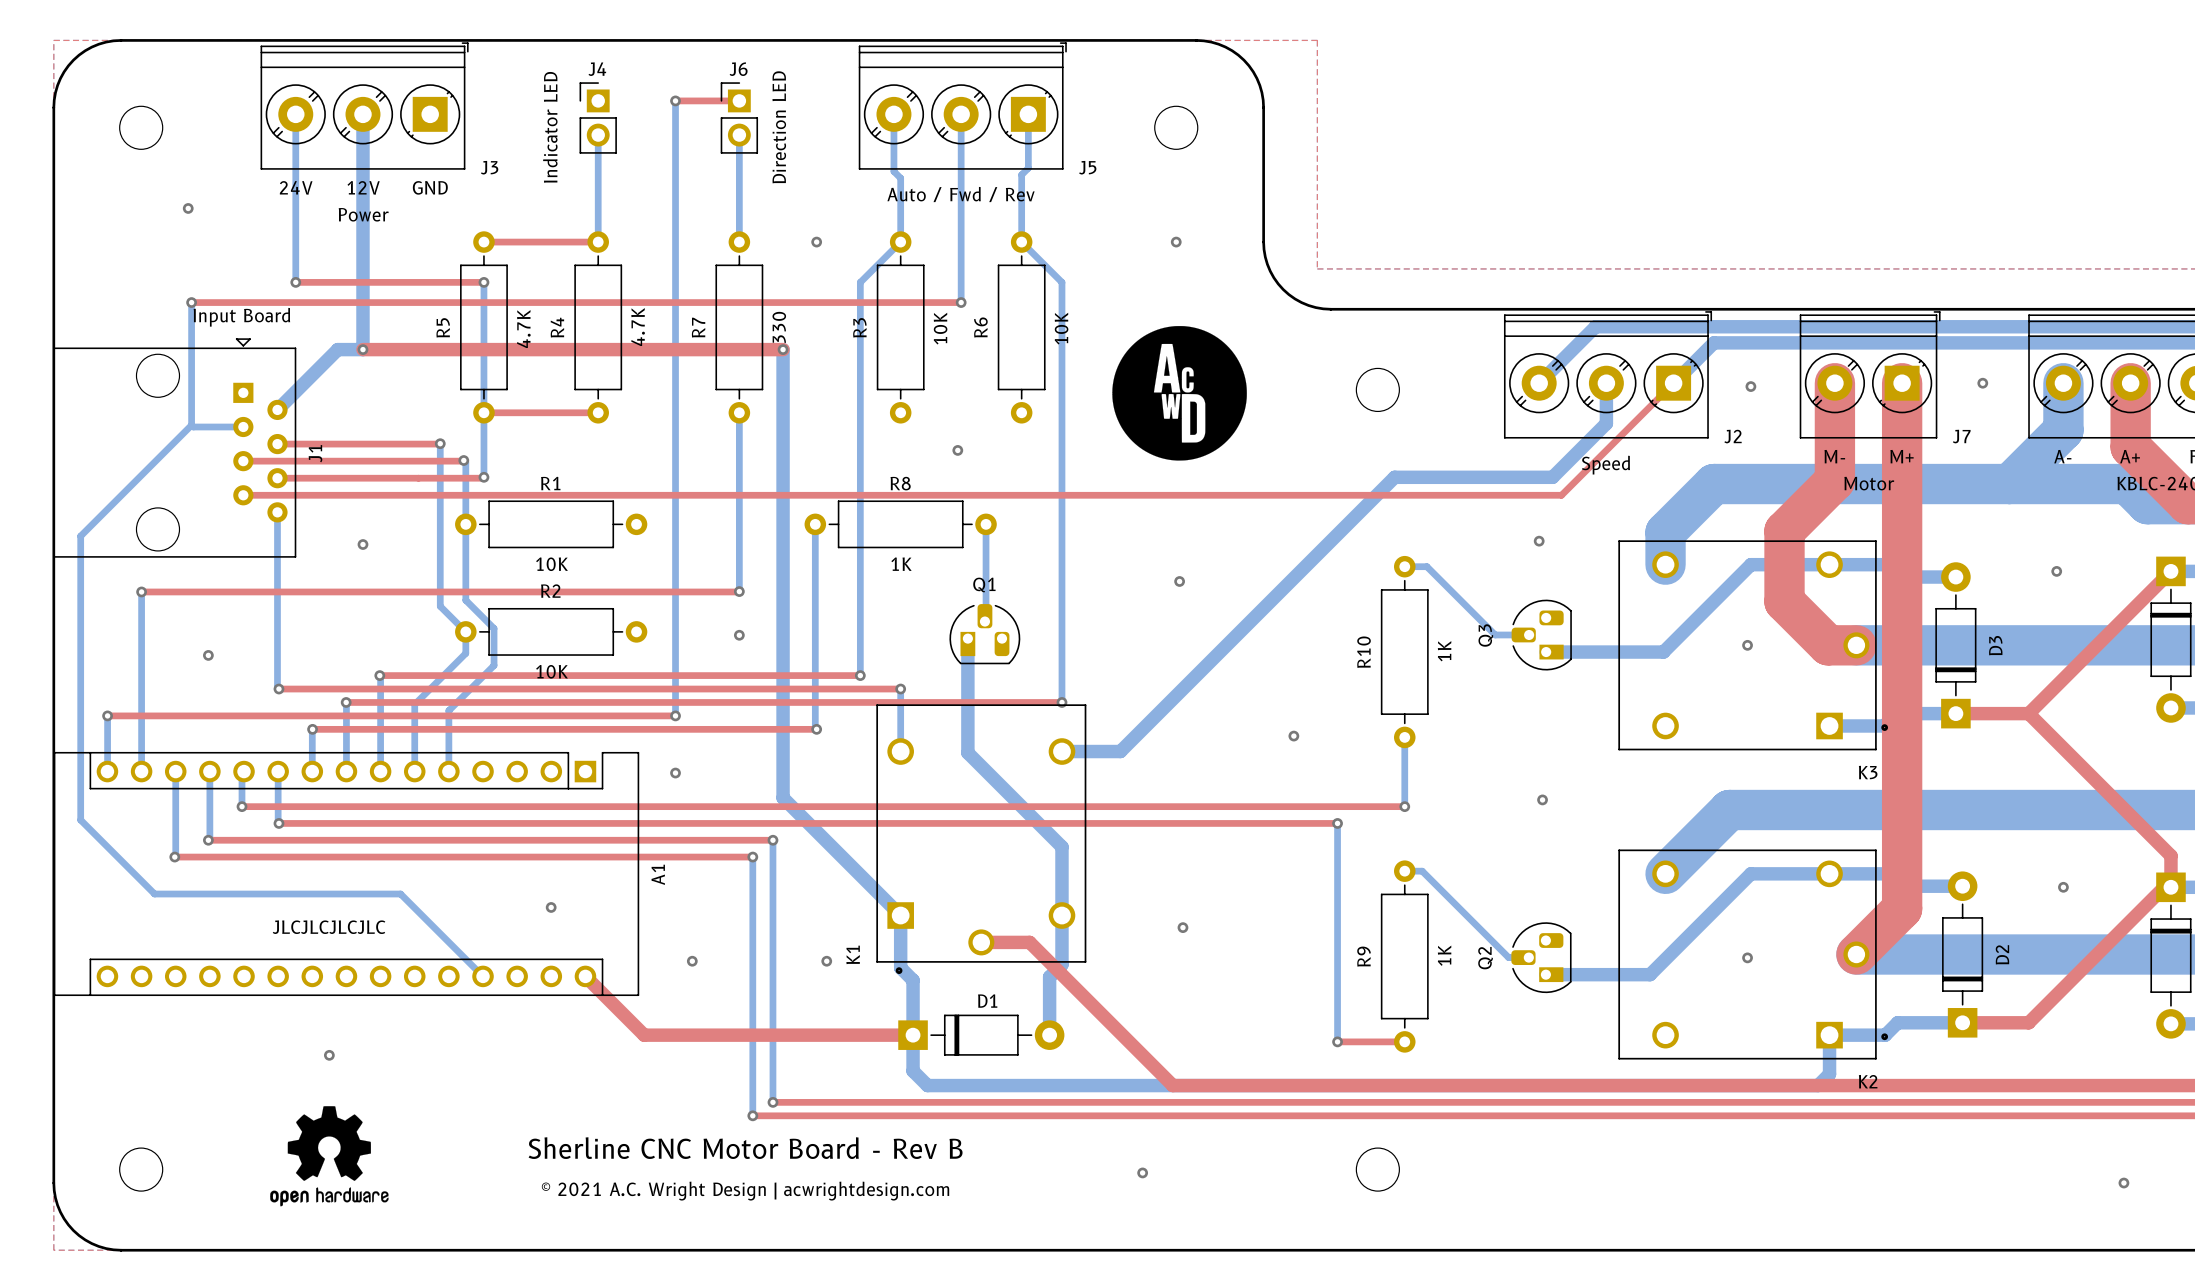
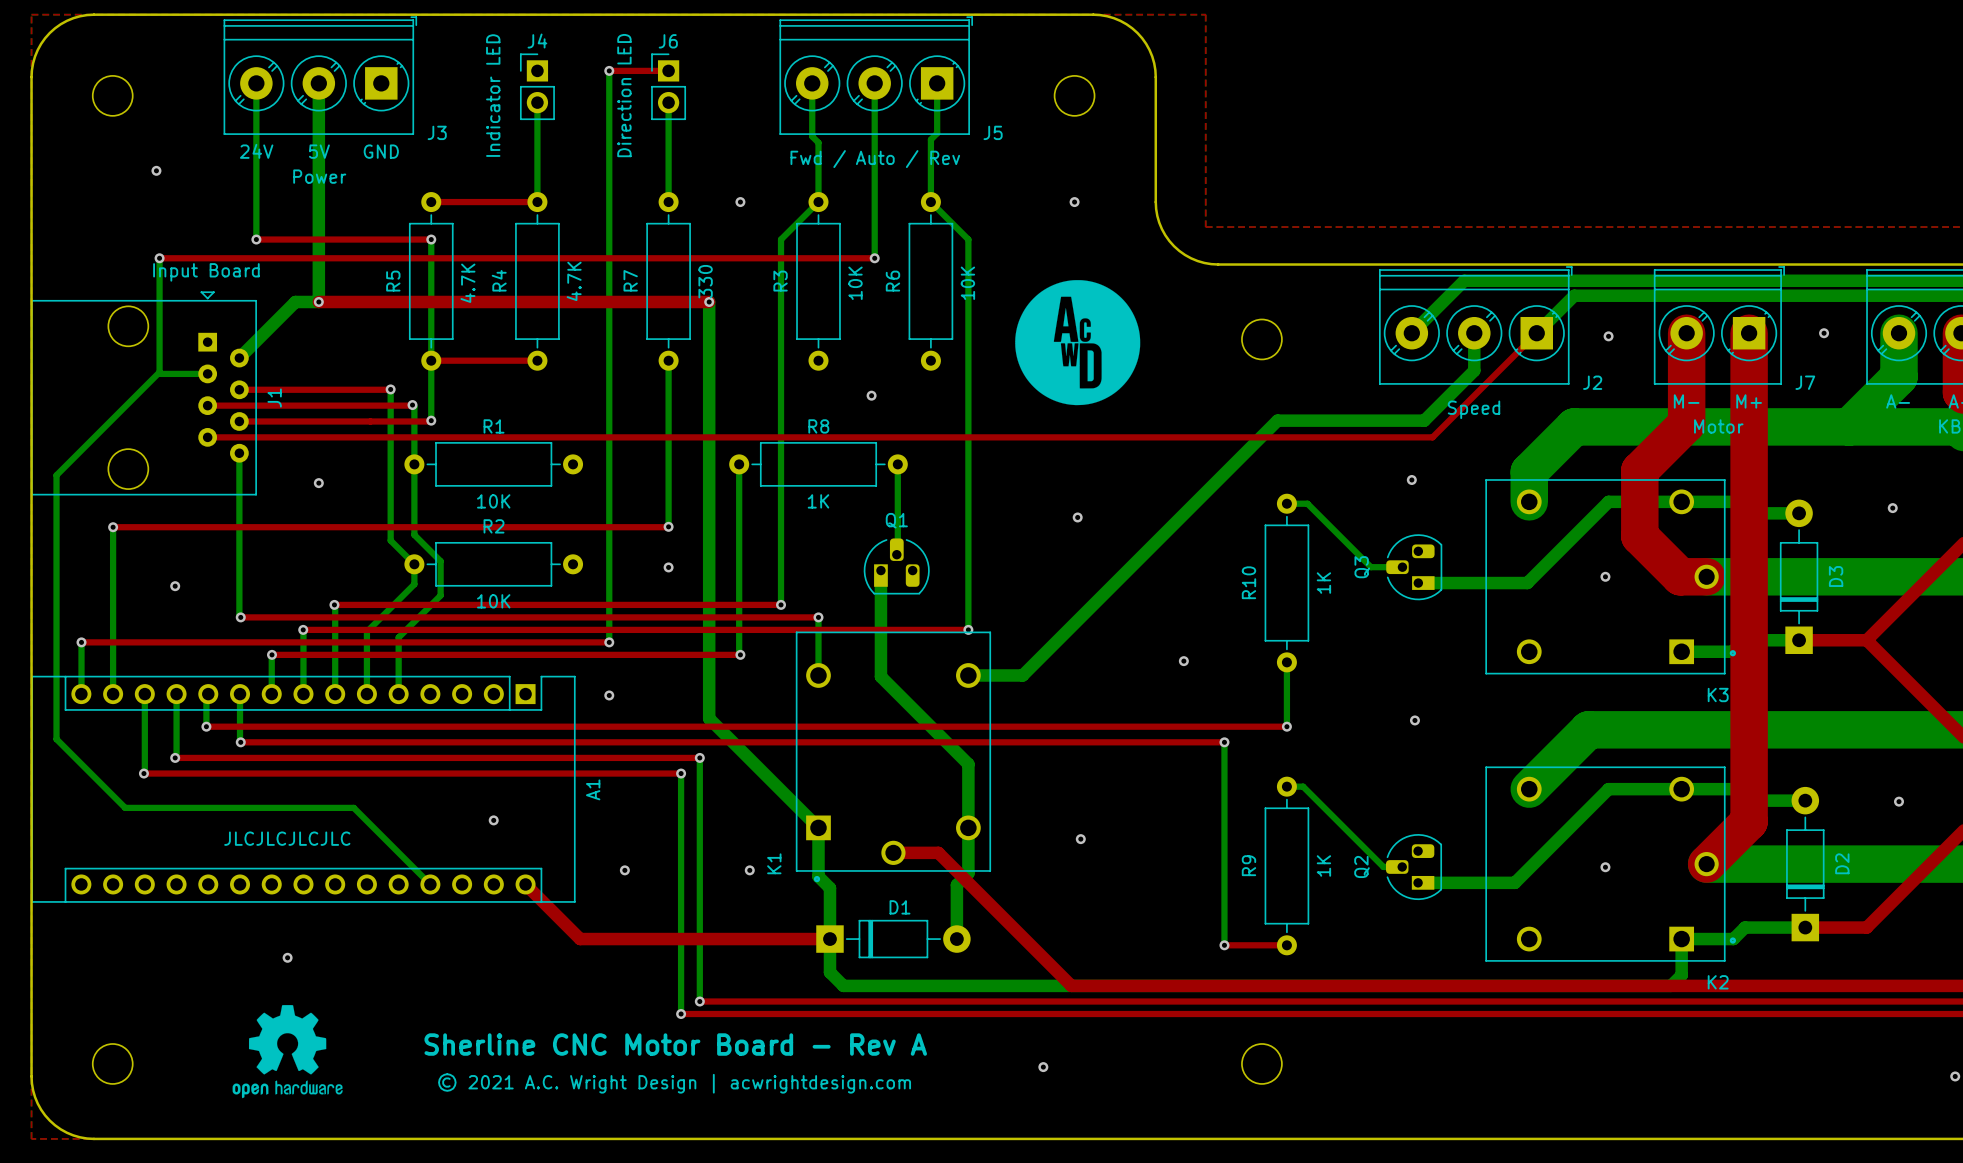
J6 value position: Direction LED (779, 127) -> Direction LED (624, 95)
text: 12V (363, 187) -> 5V (319, 151)
J5 value: Auto / Fwd / Rev (961, 194) -> Fwd / Auto / Rev (875, 159)
text: Sherline CNC Motor Board - Rev B (745, 1148) -> Sherline CNC Motor Board - Rev A (675, 1044)

